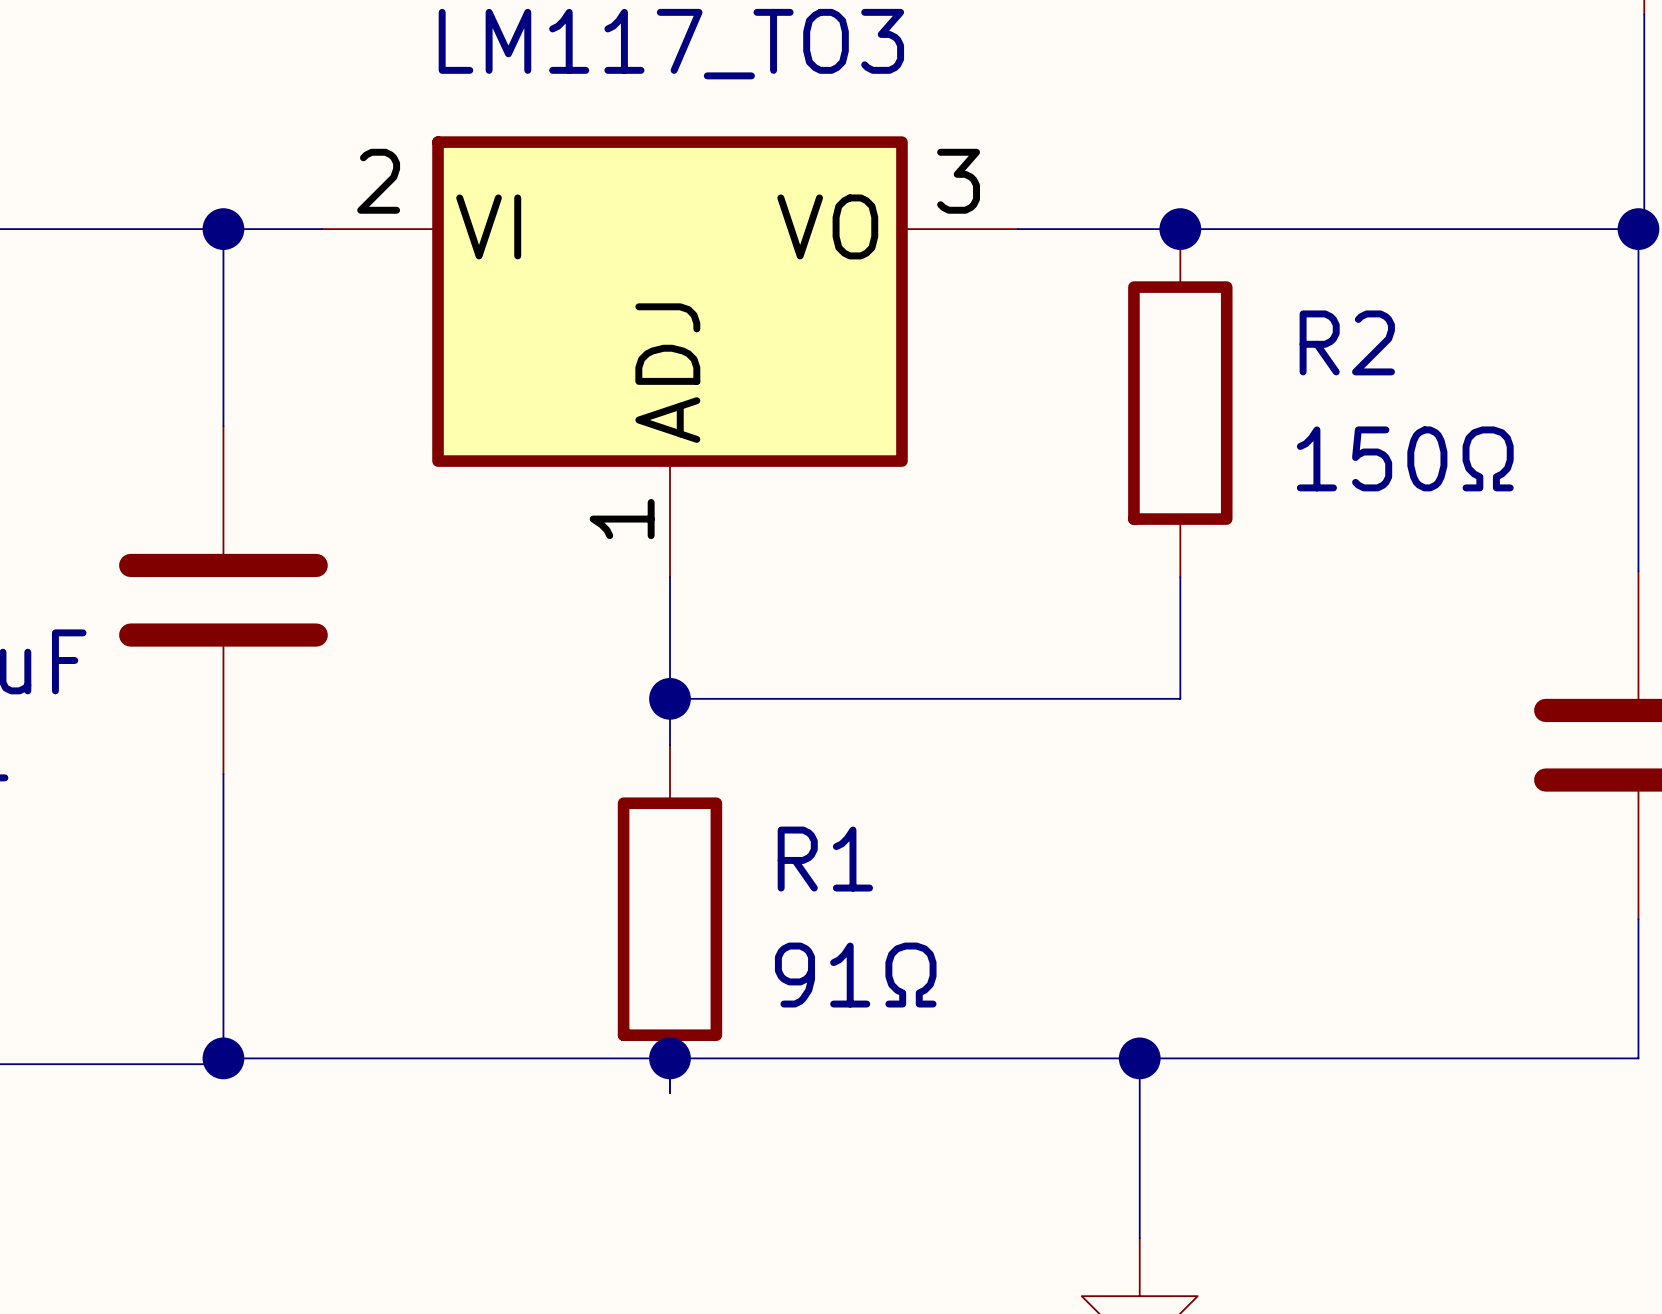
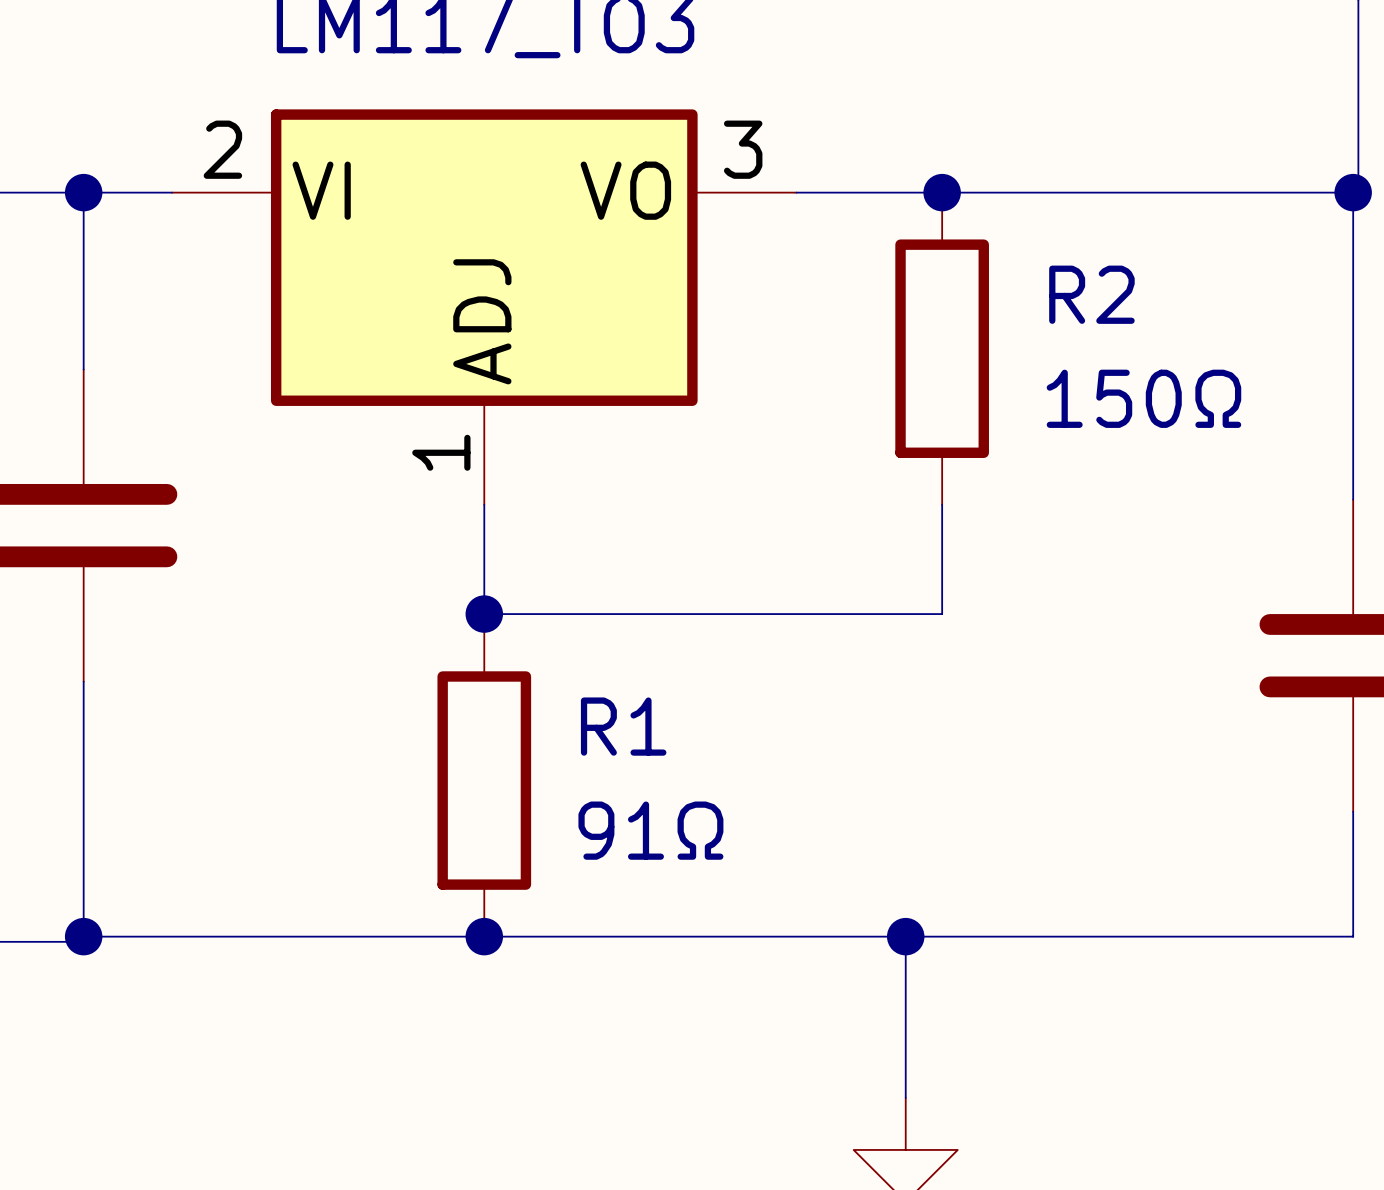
R1 position: (669, 919) -> (484, 780)

